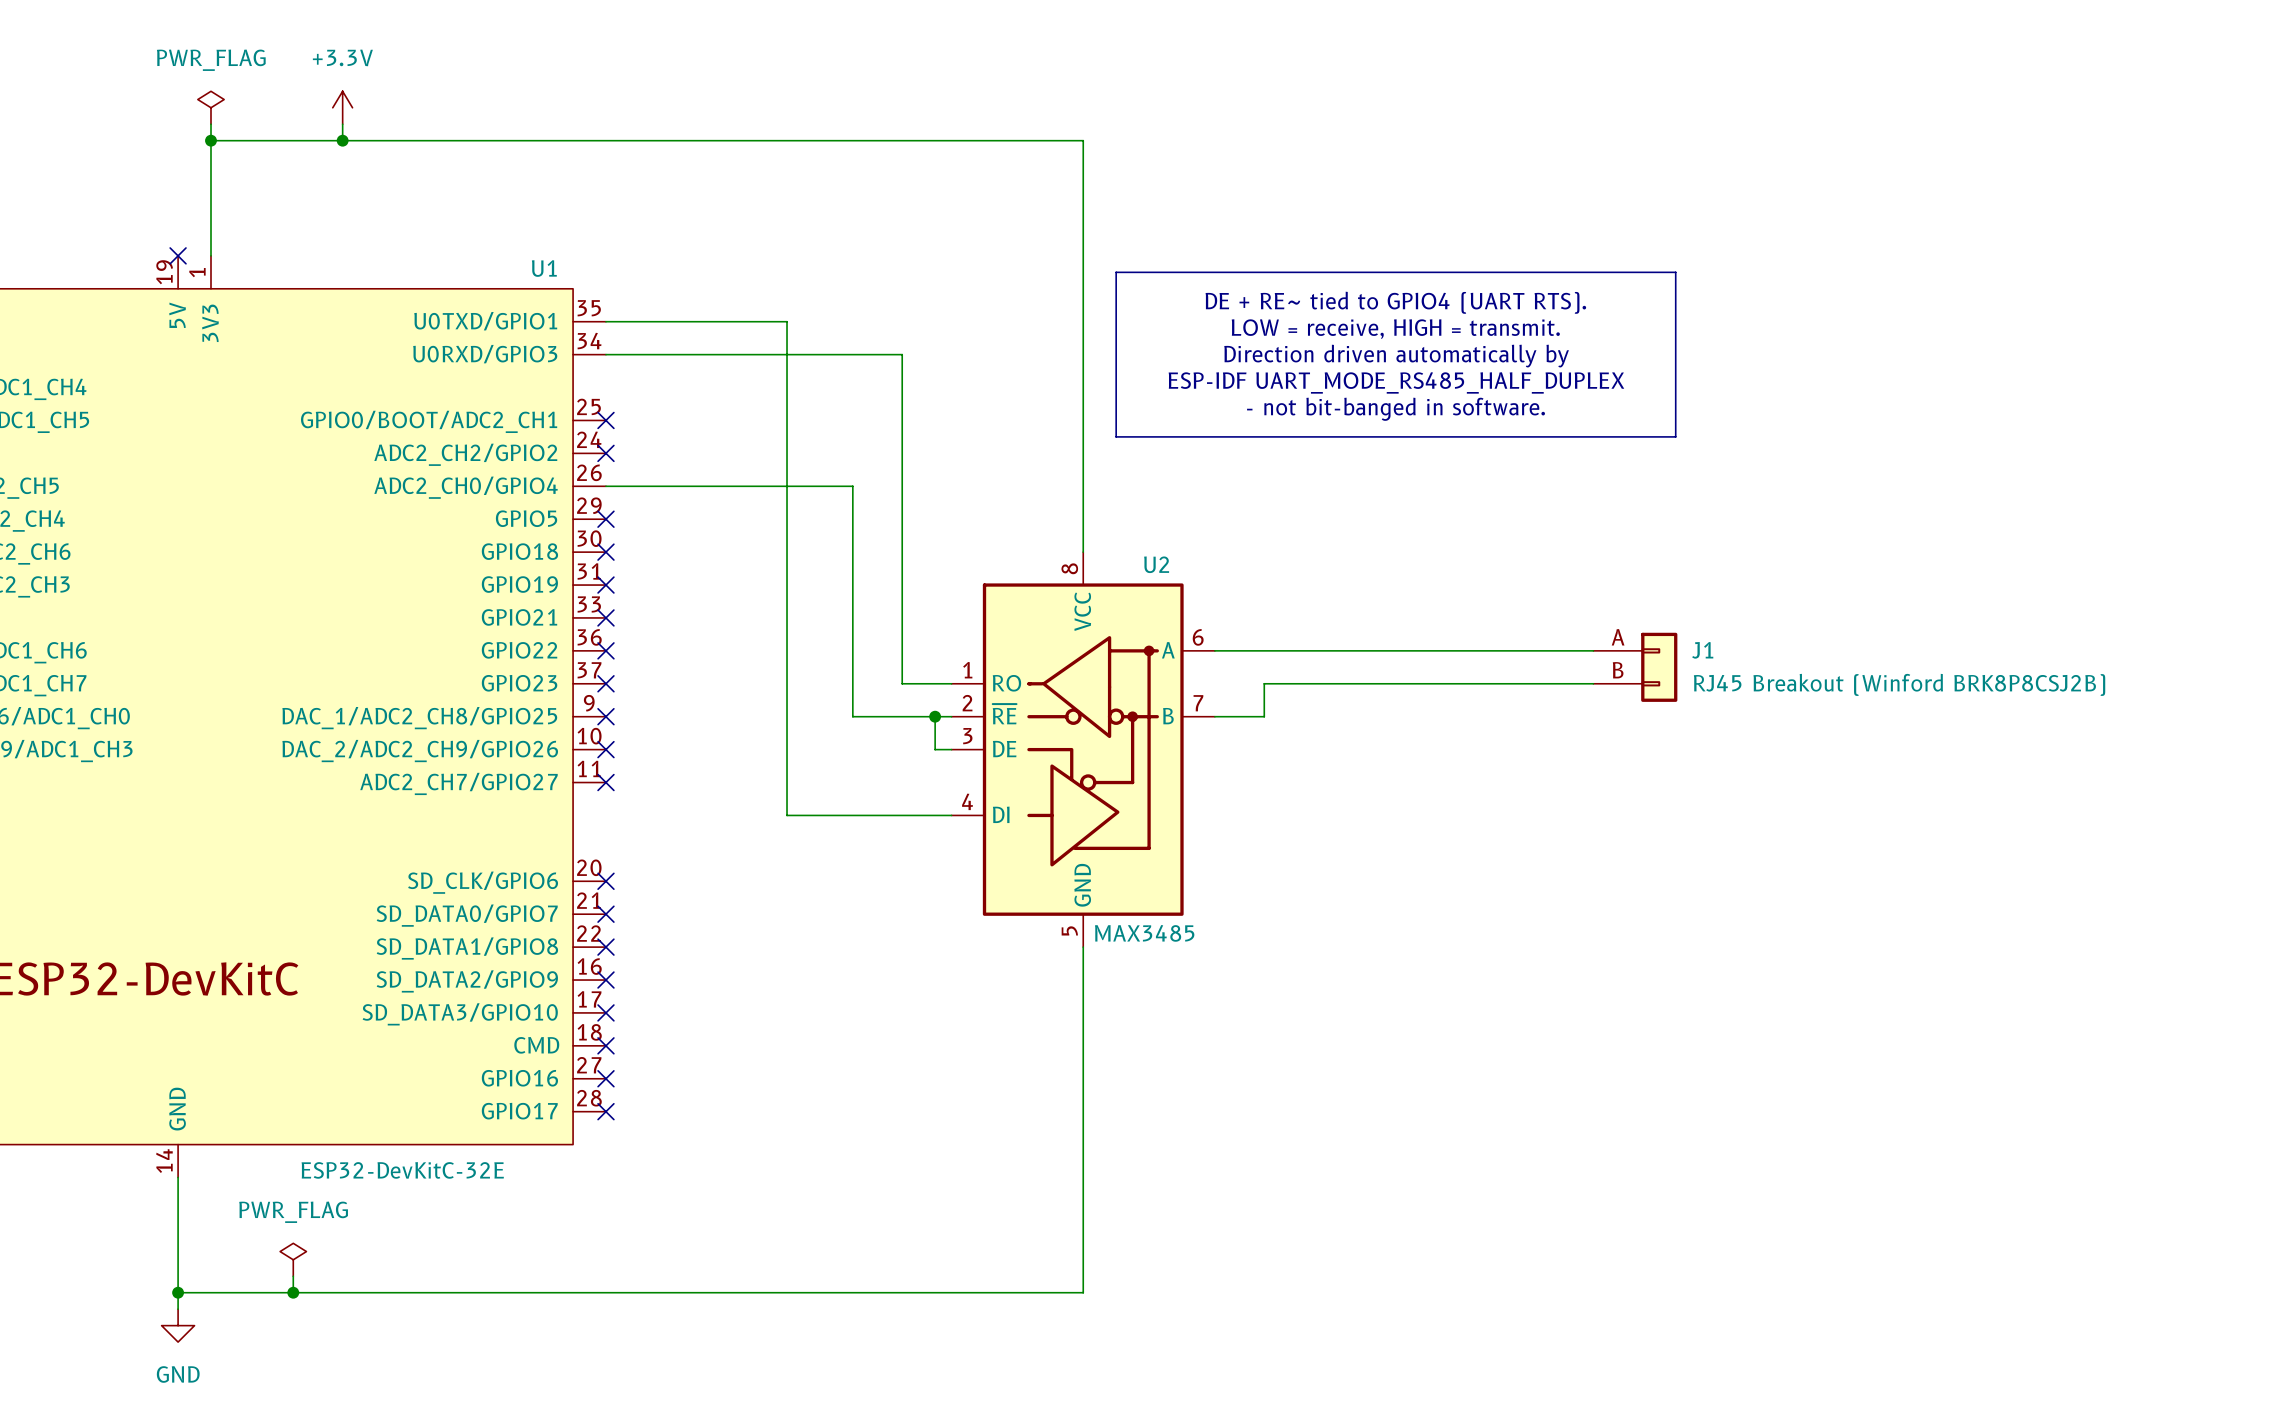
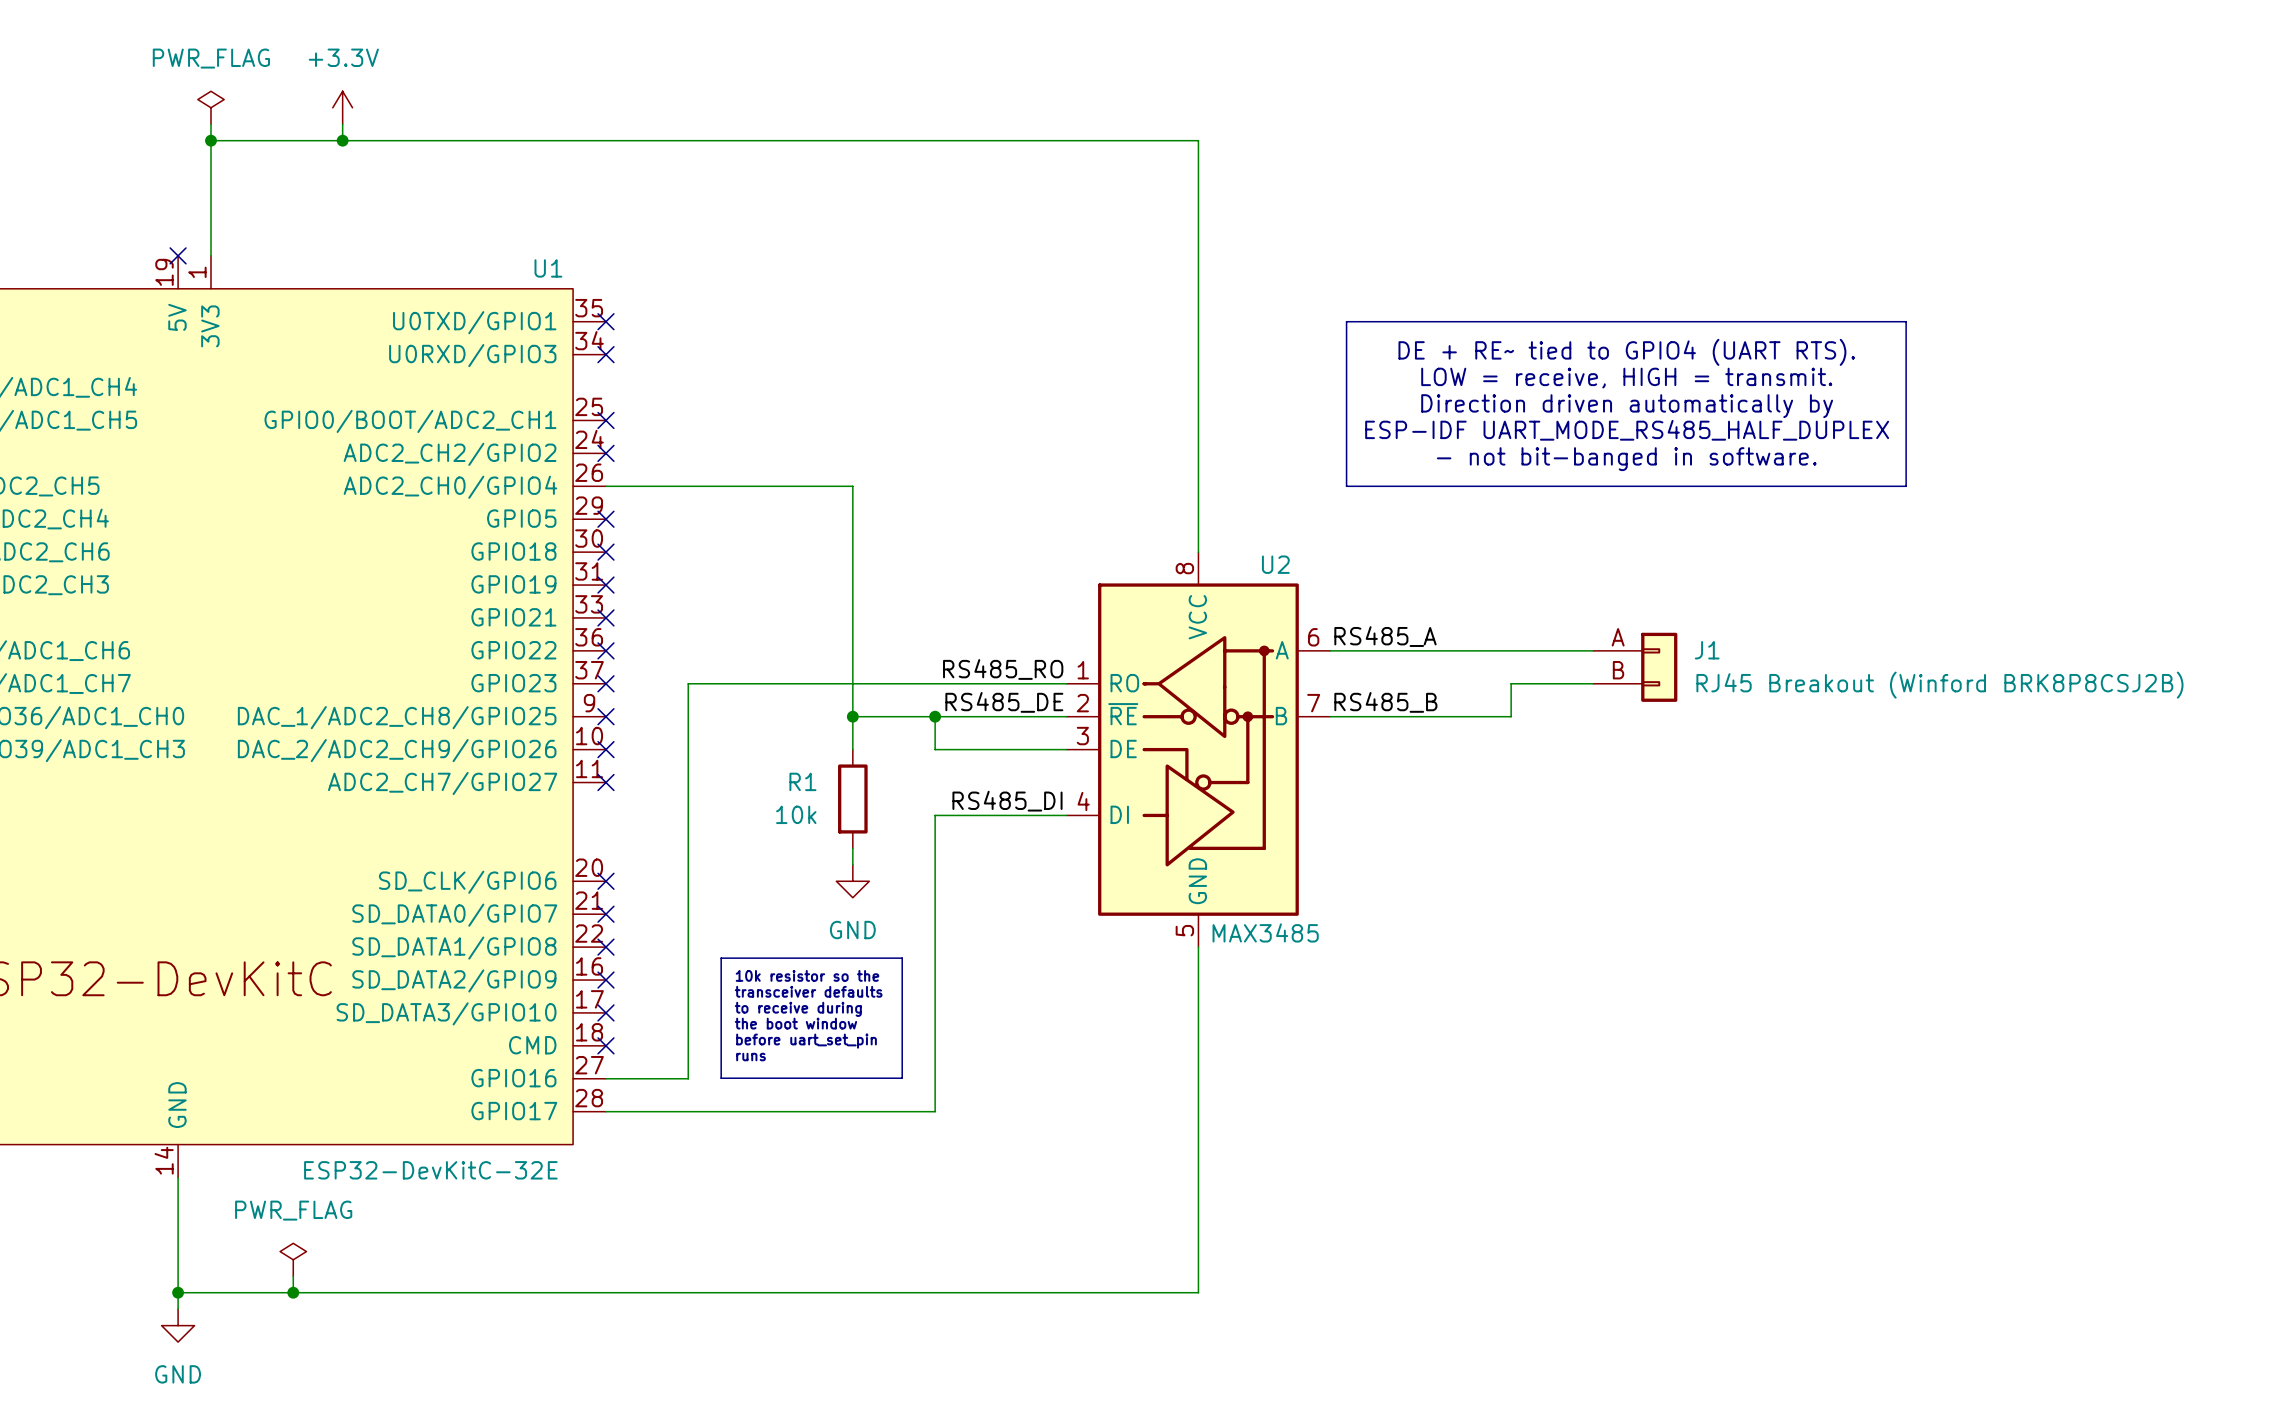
wire: (1083, 140) (1083, 552) -> (1083, 140) (1198, 140) (1198, 552)
line: (1116, 272) (1675, 272) (1675, 436) (1116, 436) (1116, 272) -> (1346, 321) (1906, 321) (1906, 486) (1346, 486) (1346, 321)
text position: DE + RE~ tied to GPIO4 (UART RTS). (1395, 302) -> DE + RE~ tied to GPIO4 (UART RTS). (1626, 352)
wire: (605, 321) (787, 321) (787, 815) (935, 815) -> (605, 1111) (935, 1111) (935, 815)
no-connect mark: none -> (605, 321)
text position: LOW = receive, HIGH = transmit. (1395, 329) -> LOW = receive, HIGH = transmit. (1626, 378)
wire: (605, 354) (902, 354) (902, 683) -> (605, 1078) (688, 1078) (688, 683) (902, 683)
no-connect mark: none -> (605, 354)
text position: Direction driven automatically by (1396, 356) -> Direction driven automatically by (1627, 406)
text position: ESP-IDF UART_MODE_RS485_HALF_DUPLEX (1396, 382) -> ESP-IDF UART_MODE_RS485_HALF_DUPLEX (1627, 430)
text position: - not bit-banged in software. (1396, 409) -> - not bit-banged in software. (1626, 459)
label: none -> RS485_A (1385, 636)
label: none -> RS485_RO (1003, 669)
wire: (1511, 683) (1264, 683) (1264, 716) (1214, 716) -> (1511, 683) (1511, 716) (1330, 716)
label: none -> RS485_DE (1004, 702)
label: none -> RS485_B (1385, 702)
wire: none -> (852, 716) (852, 749)
junction: none -> (852, 716)
U2 position: (1083, 749) -> (1198, 749)
R1: none -> 10k (852, 798)
label: none -> RS485_DI (1007, 801)
wire: none -> (852, 848) (852, 864)
power symbol: none -> GND (852, 881)
wire: (1083, 947) (1083, 1292) -> (1198, 947) (1198, 1292) (1083, 1292)
line: none -> (721, 958) (902, 958) (902, 1078) (721, 1078) (721, 958)
text: none -> 10k resistor so the (807, 975)
text: none -> transceiver defaults (808, 991)
text: none -> to receive during (798, 1009)
text: none -> the boot window (795, 1023)
text: none -> before uart_set_pin (806, 1041)
text: none -> runs (751, 1057)
no-connect mark: (605, 1078) -> none
no-connect mark: (605, 1111) -> none

